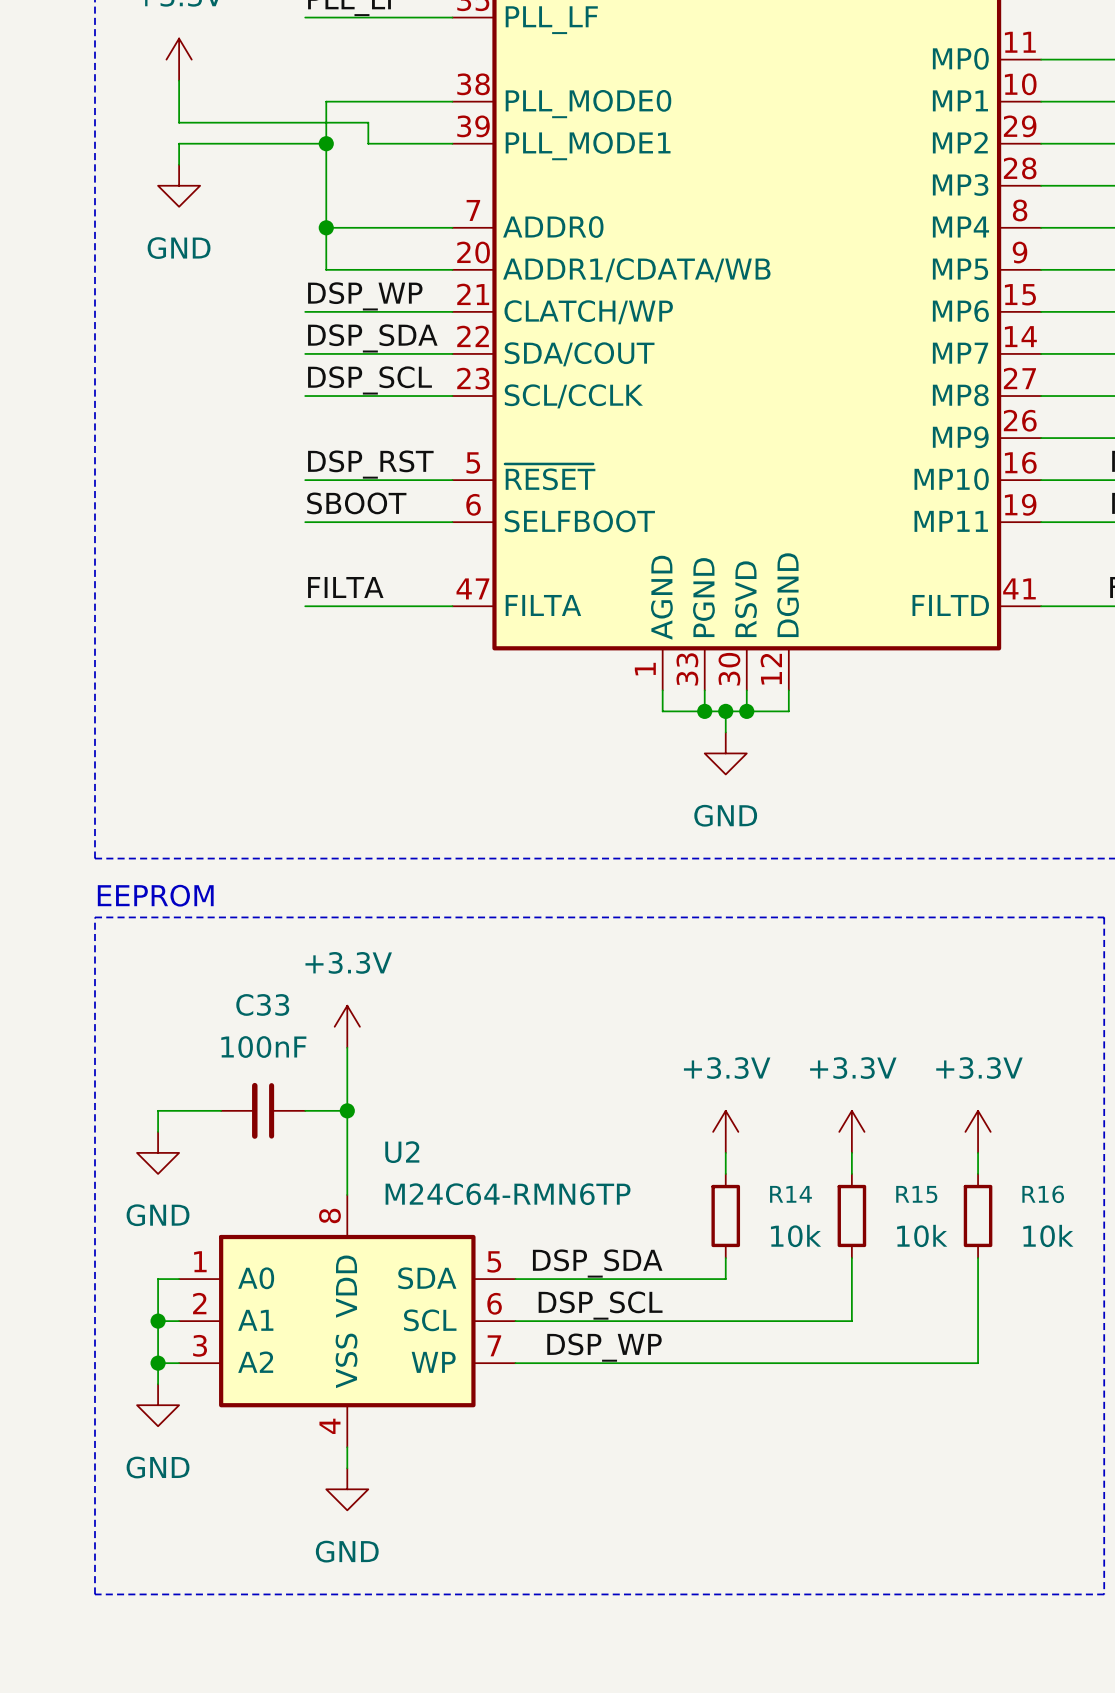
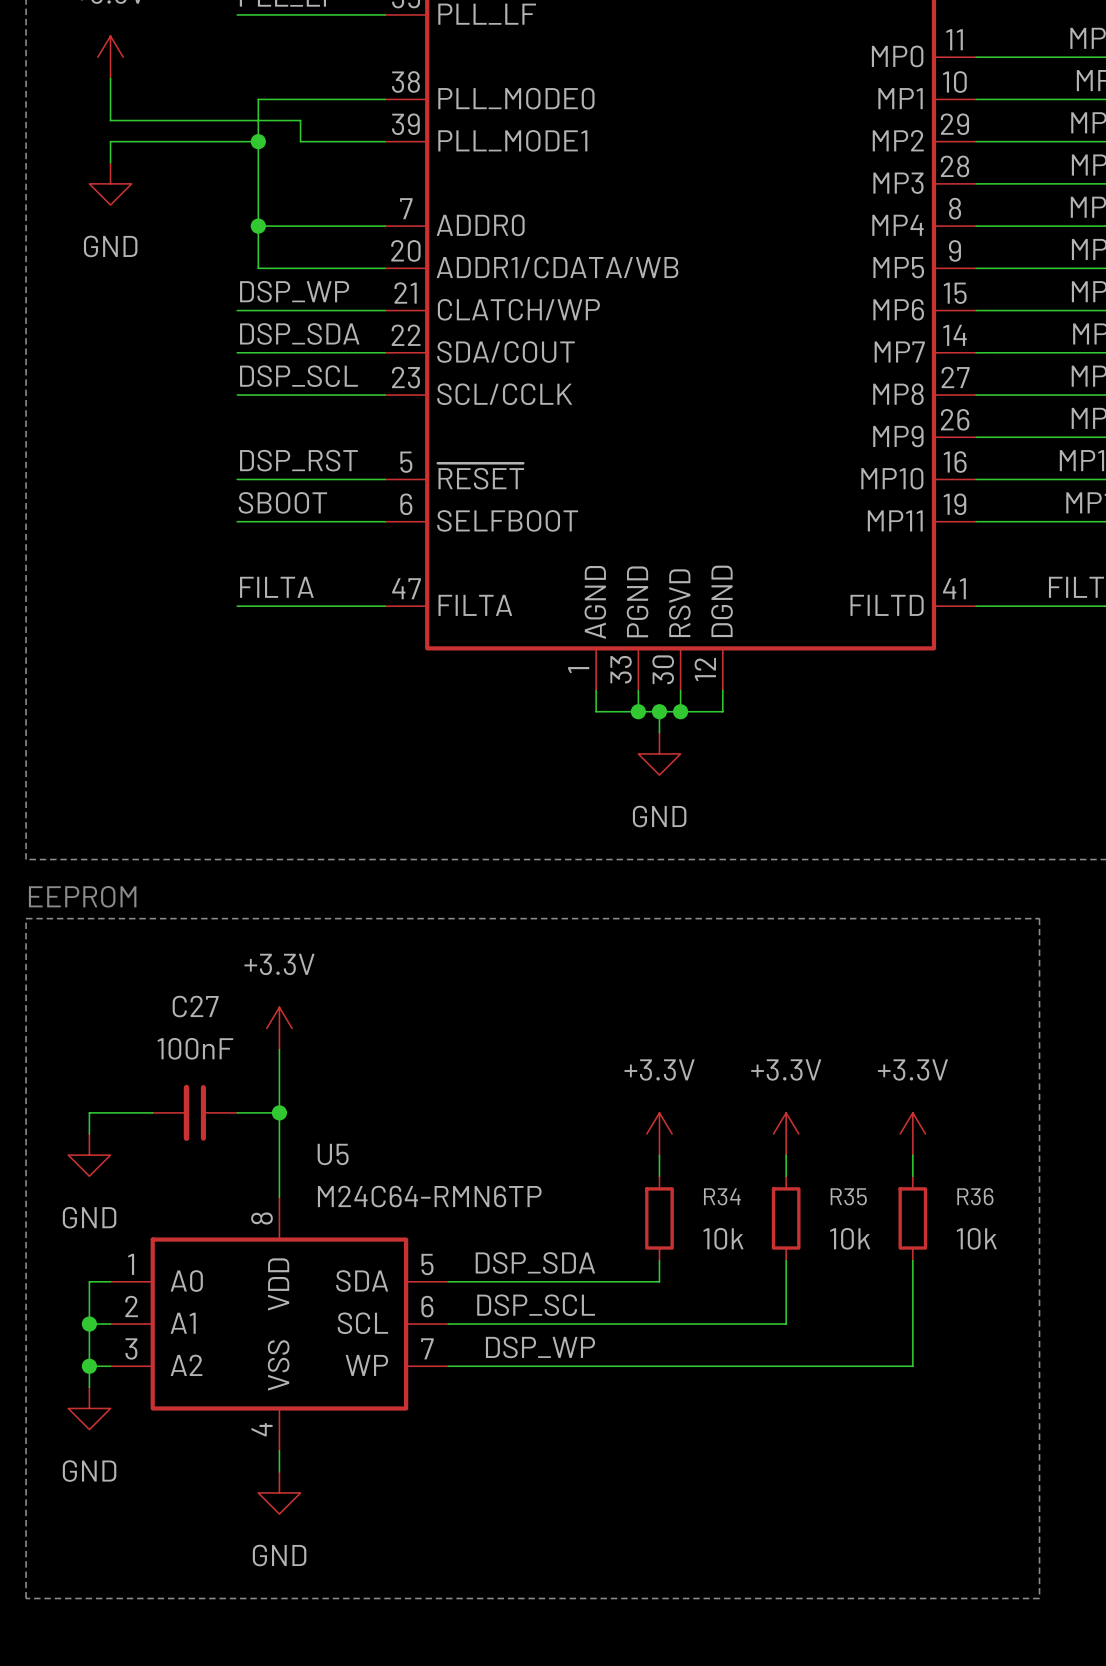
C33 name: C33 (262, 1004) -> C27 (195, 1006)
U2 name: U2 (402, 1152) -> U5 (333, 1154)
R14 name: R14 (790, 1194) -> R34 (722, 1196)
R15 name: R15 (916, 1194) -> R35 (848, 1196)
R16 name: R16 (1043, 1194) -> R36 (975, 1196)

